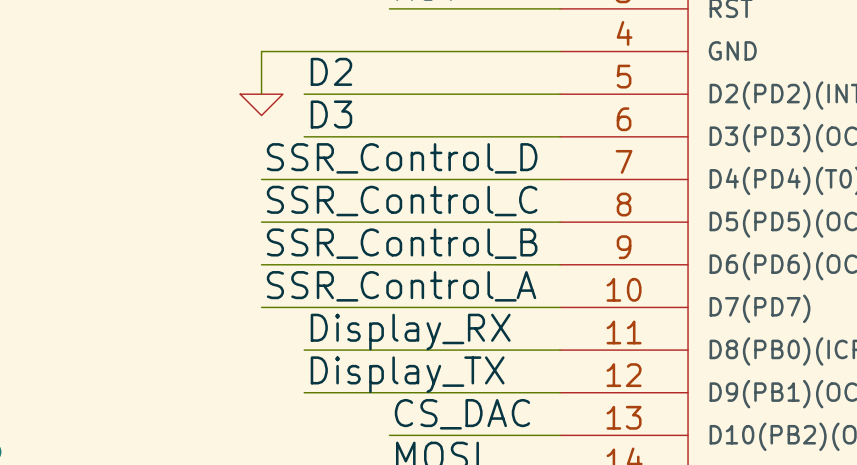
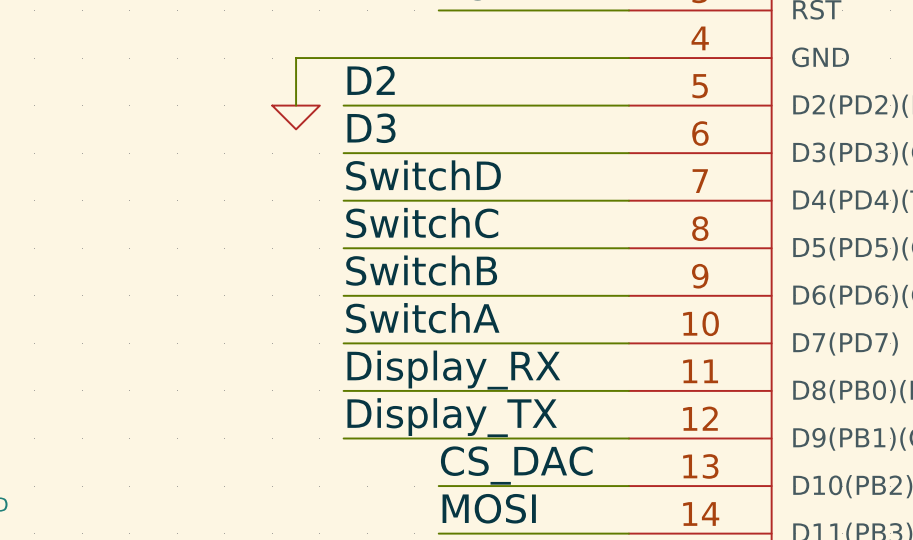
label: none -> SwitchD (423, 175)
label: SSR_Control_D (402, 158) -> none
wire: (261, 179) (304, 179) -> none
label: none -> SwitchC (422, 223)
label: SSR_Control_C (402, 201) -> none
wire: (261, 222) (304, 222) -> none
label: none -> SwitchB (421, 270)
label: SSR_Control_B (402, 243) -> none
wire: (261, 264) (304, 264) -> none
label: none -> SwitchA (422, 318)
label: SSR_Control_A (401, 286) -> none
wire: (261, 307) (304, 307) -> none

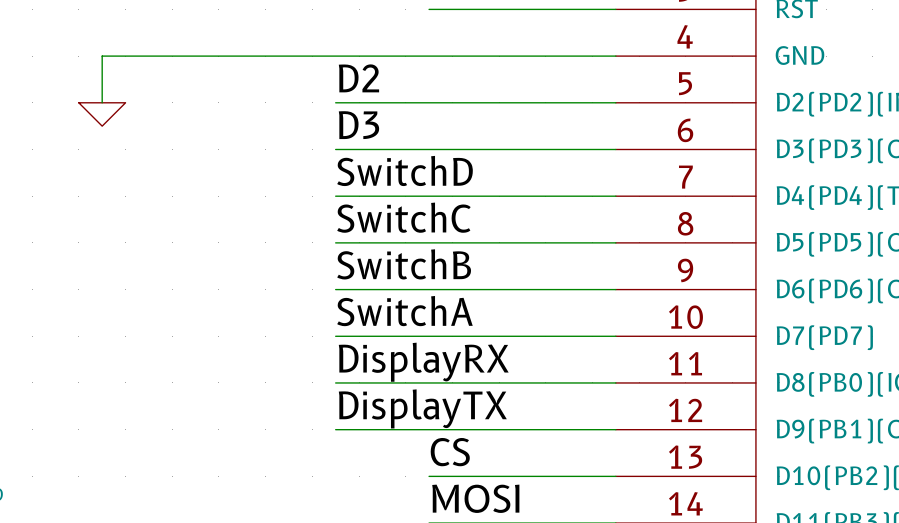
wire: (296, 58) (296, 105) -> (288, 56) (102, 56) (102, 102)
power symbol: none -> (102, 114)
power symbol: (296, 117) -> none
label: Display_RX (453, 370) -> DisplayRX (423, 362)
label: Display_TX (452, 417) -> DisplayTX (422, 408)
label: CS_DAC (516, 465) -> CS (450, 452)

